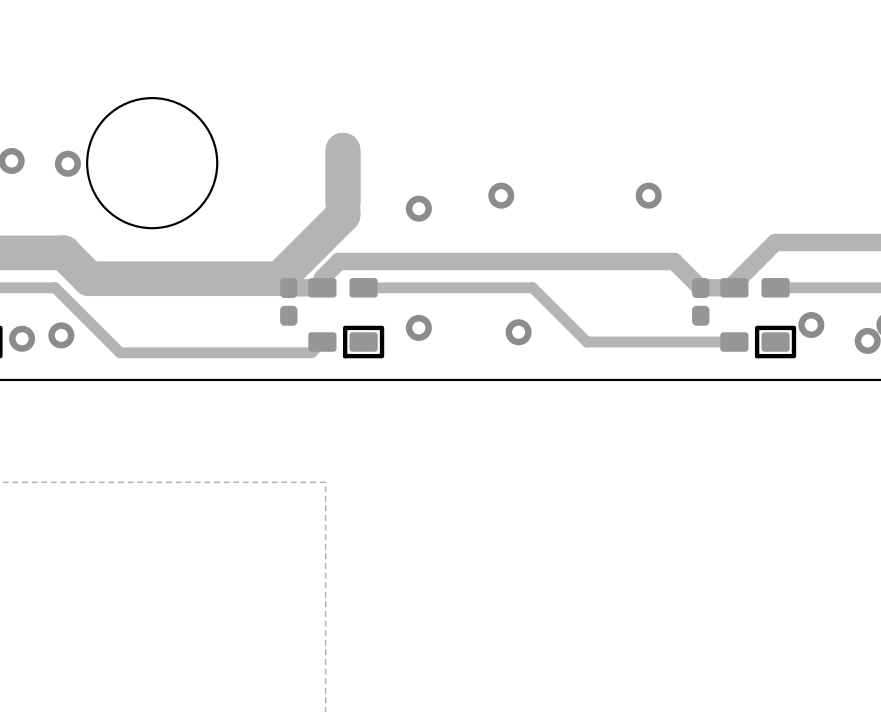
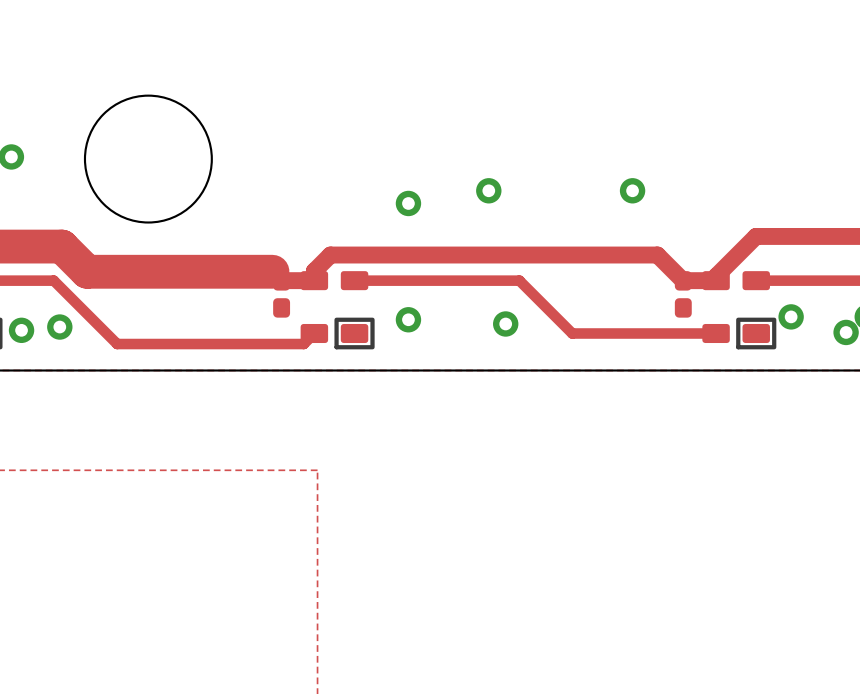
track: (342, 150) (342, 215) (279, 278) -> none
via: (67, 163) -> none

